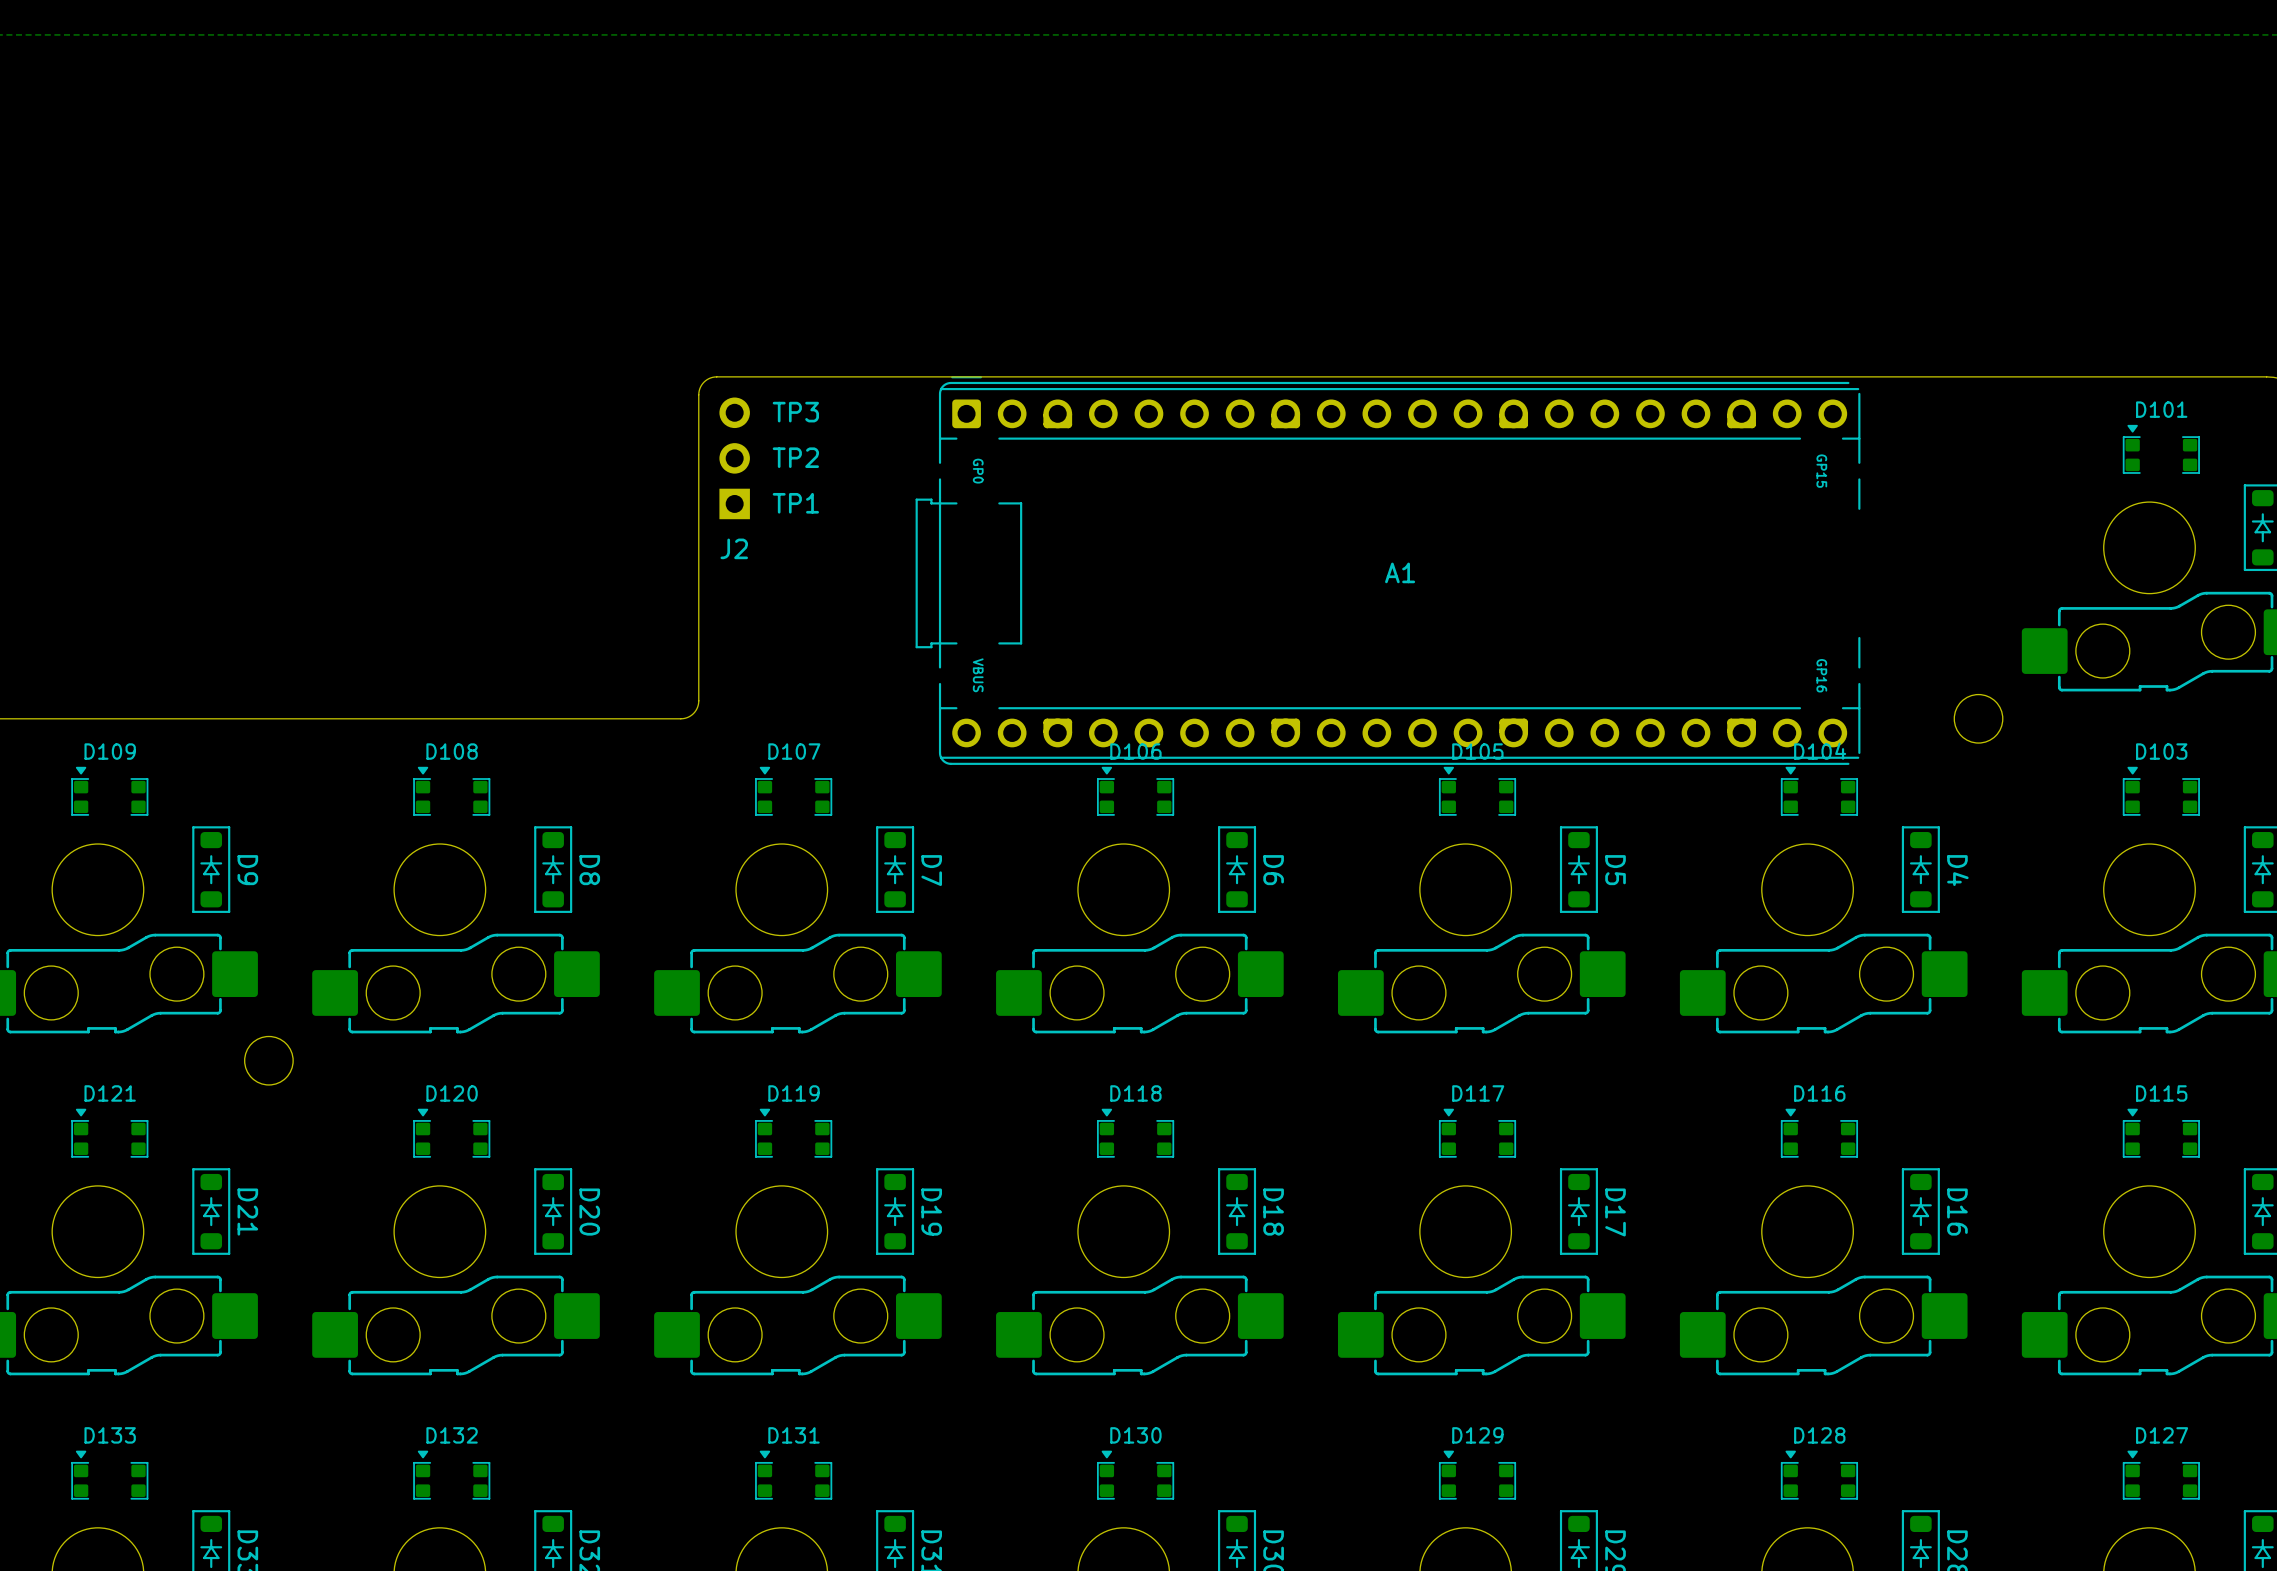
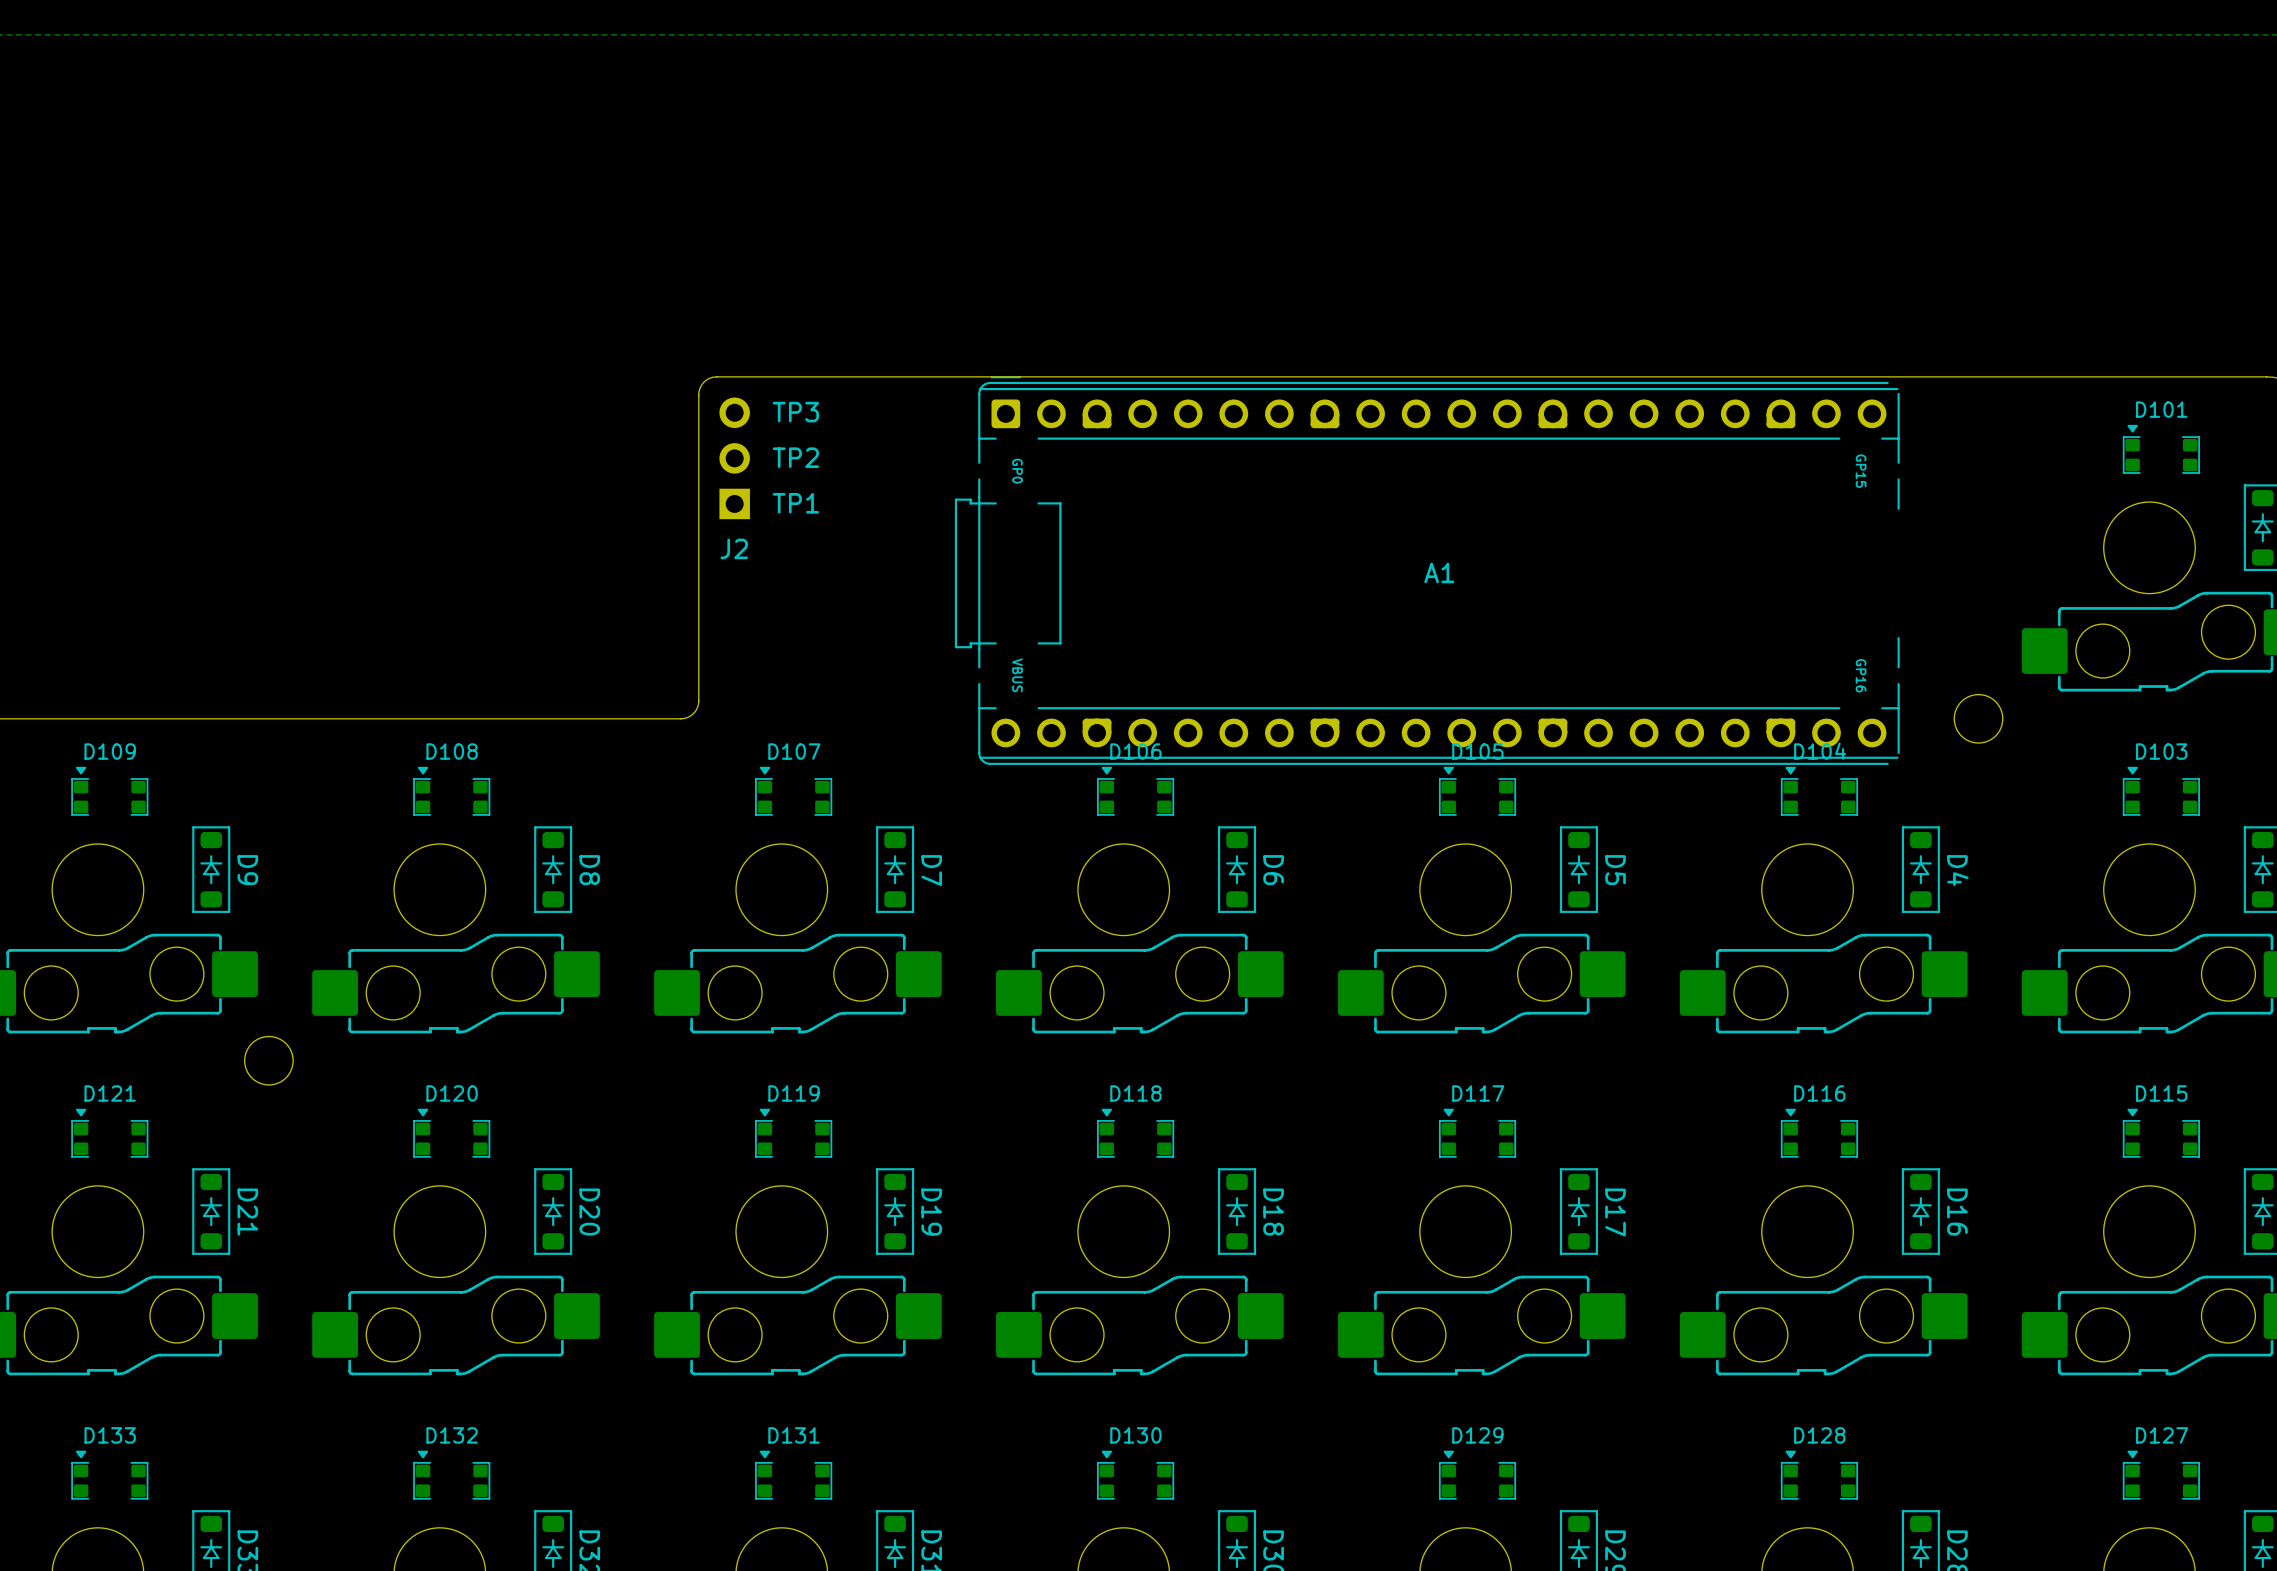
A1 position: (1388, 570) -> (1427, 570)

